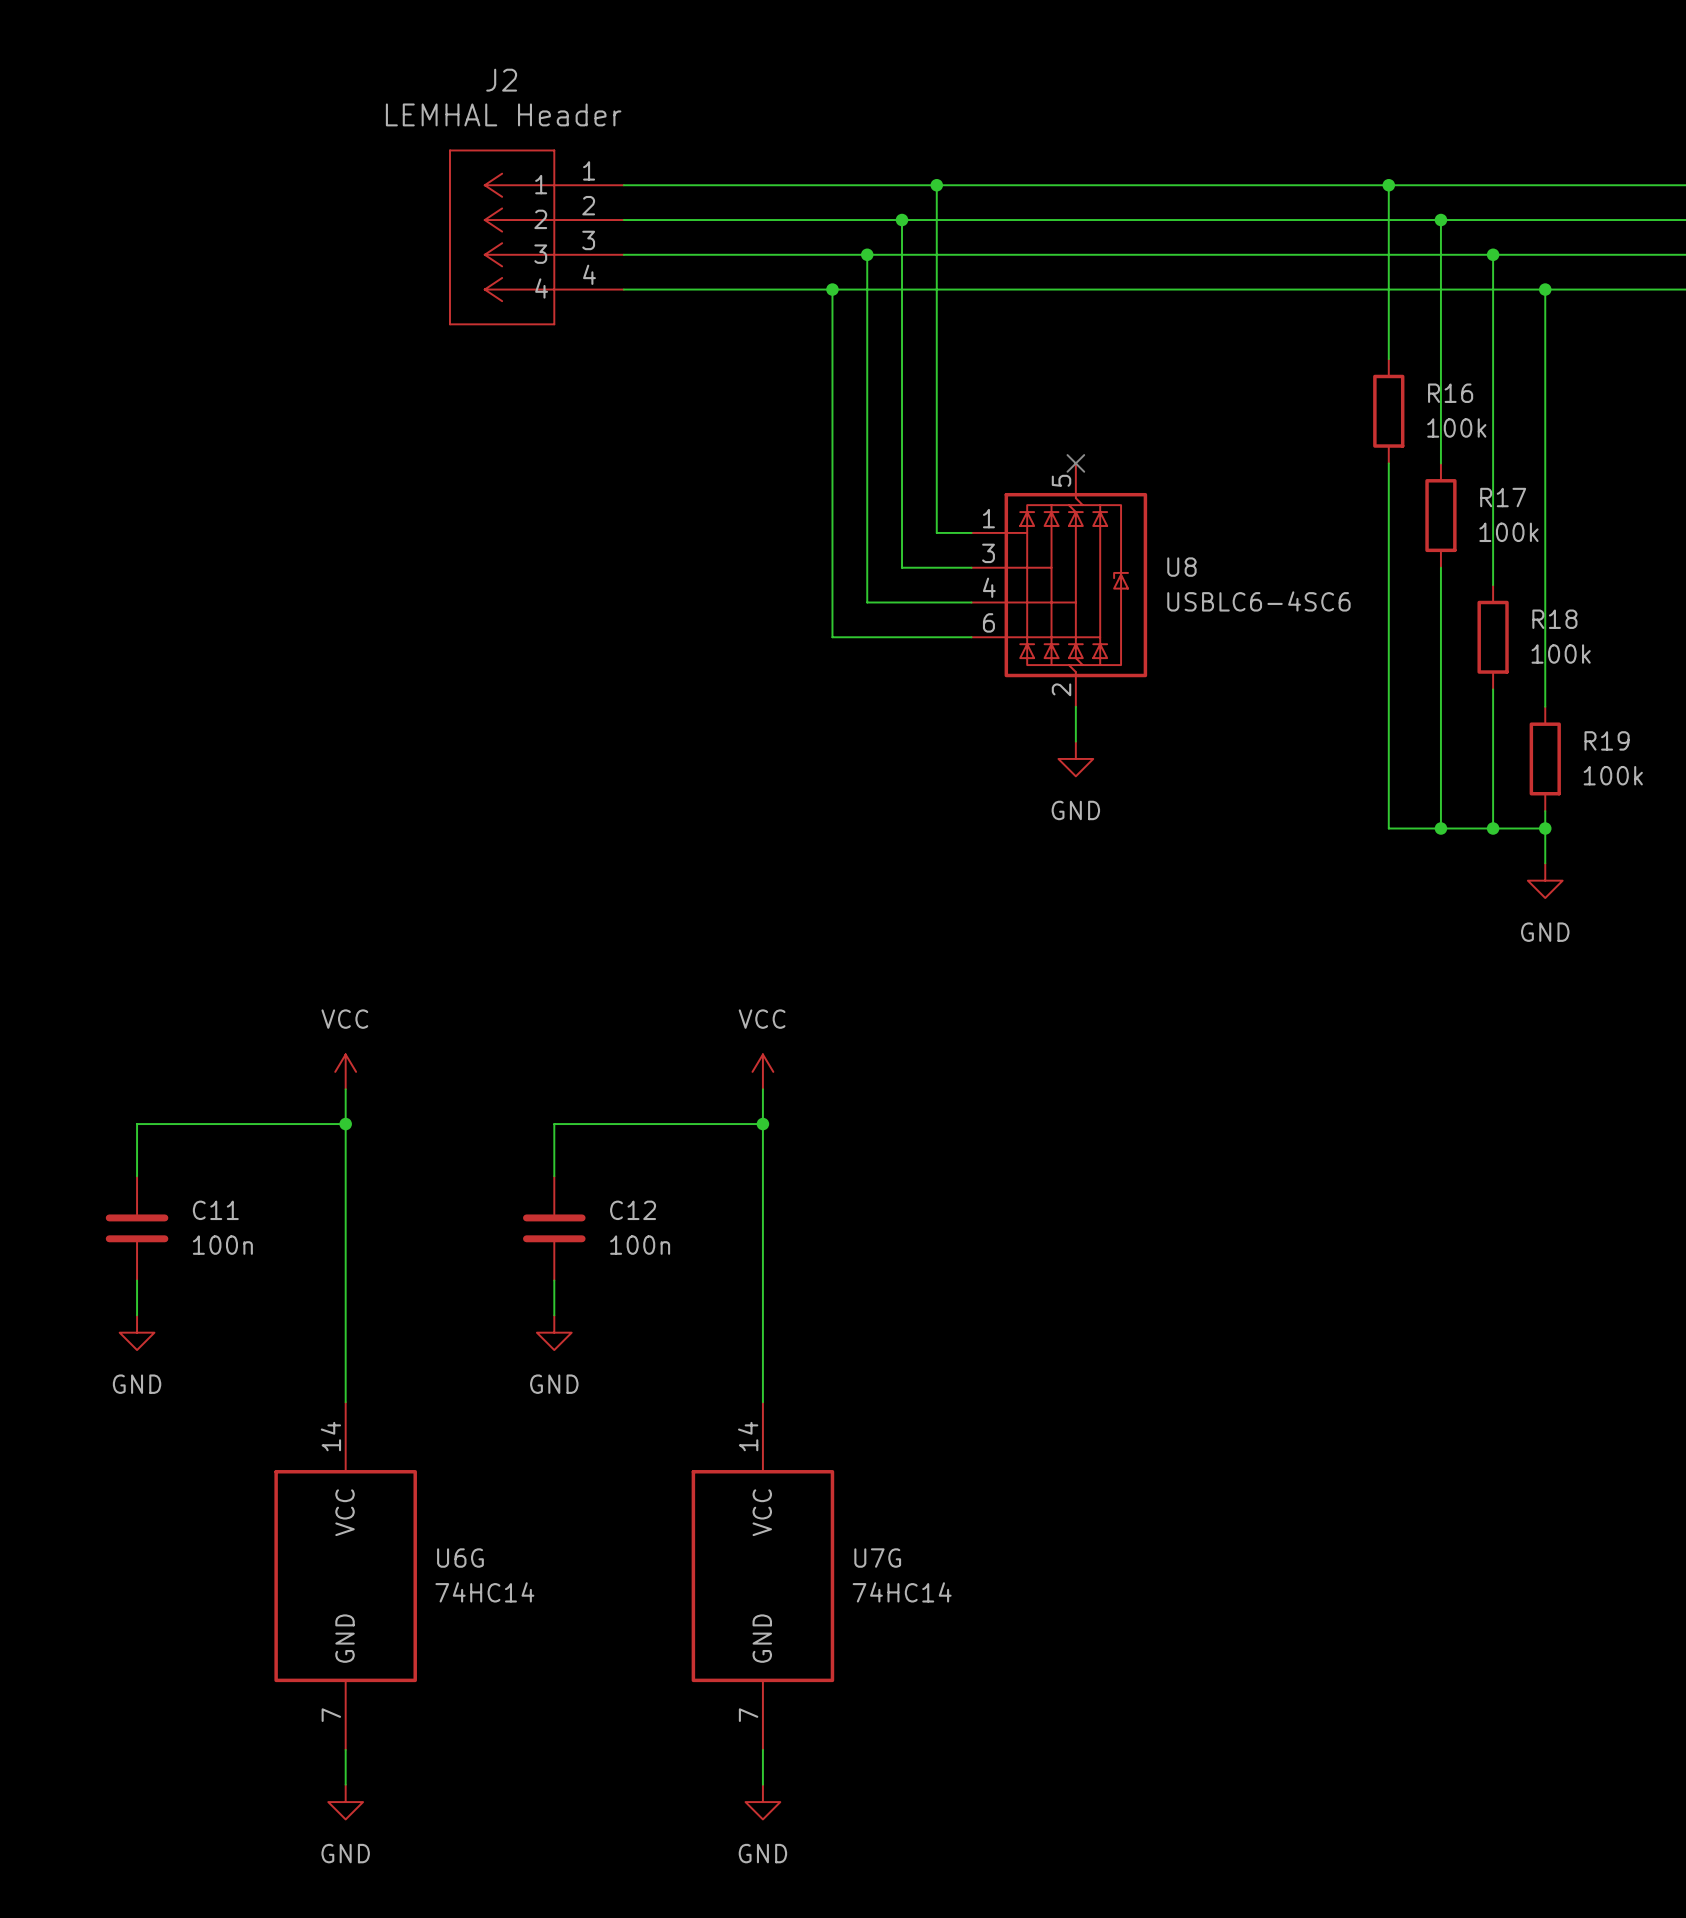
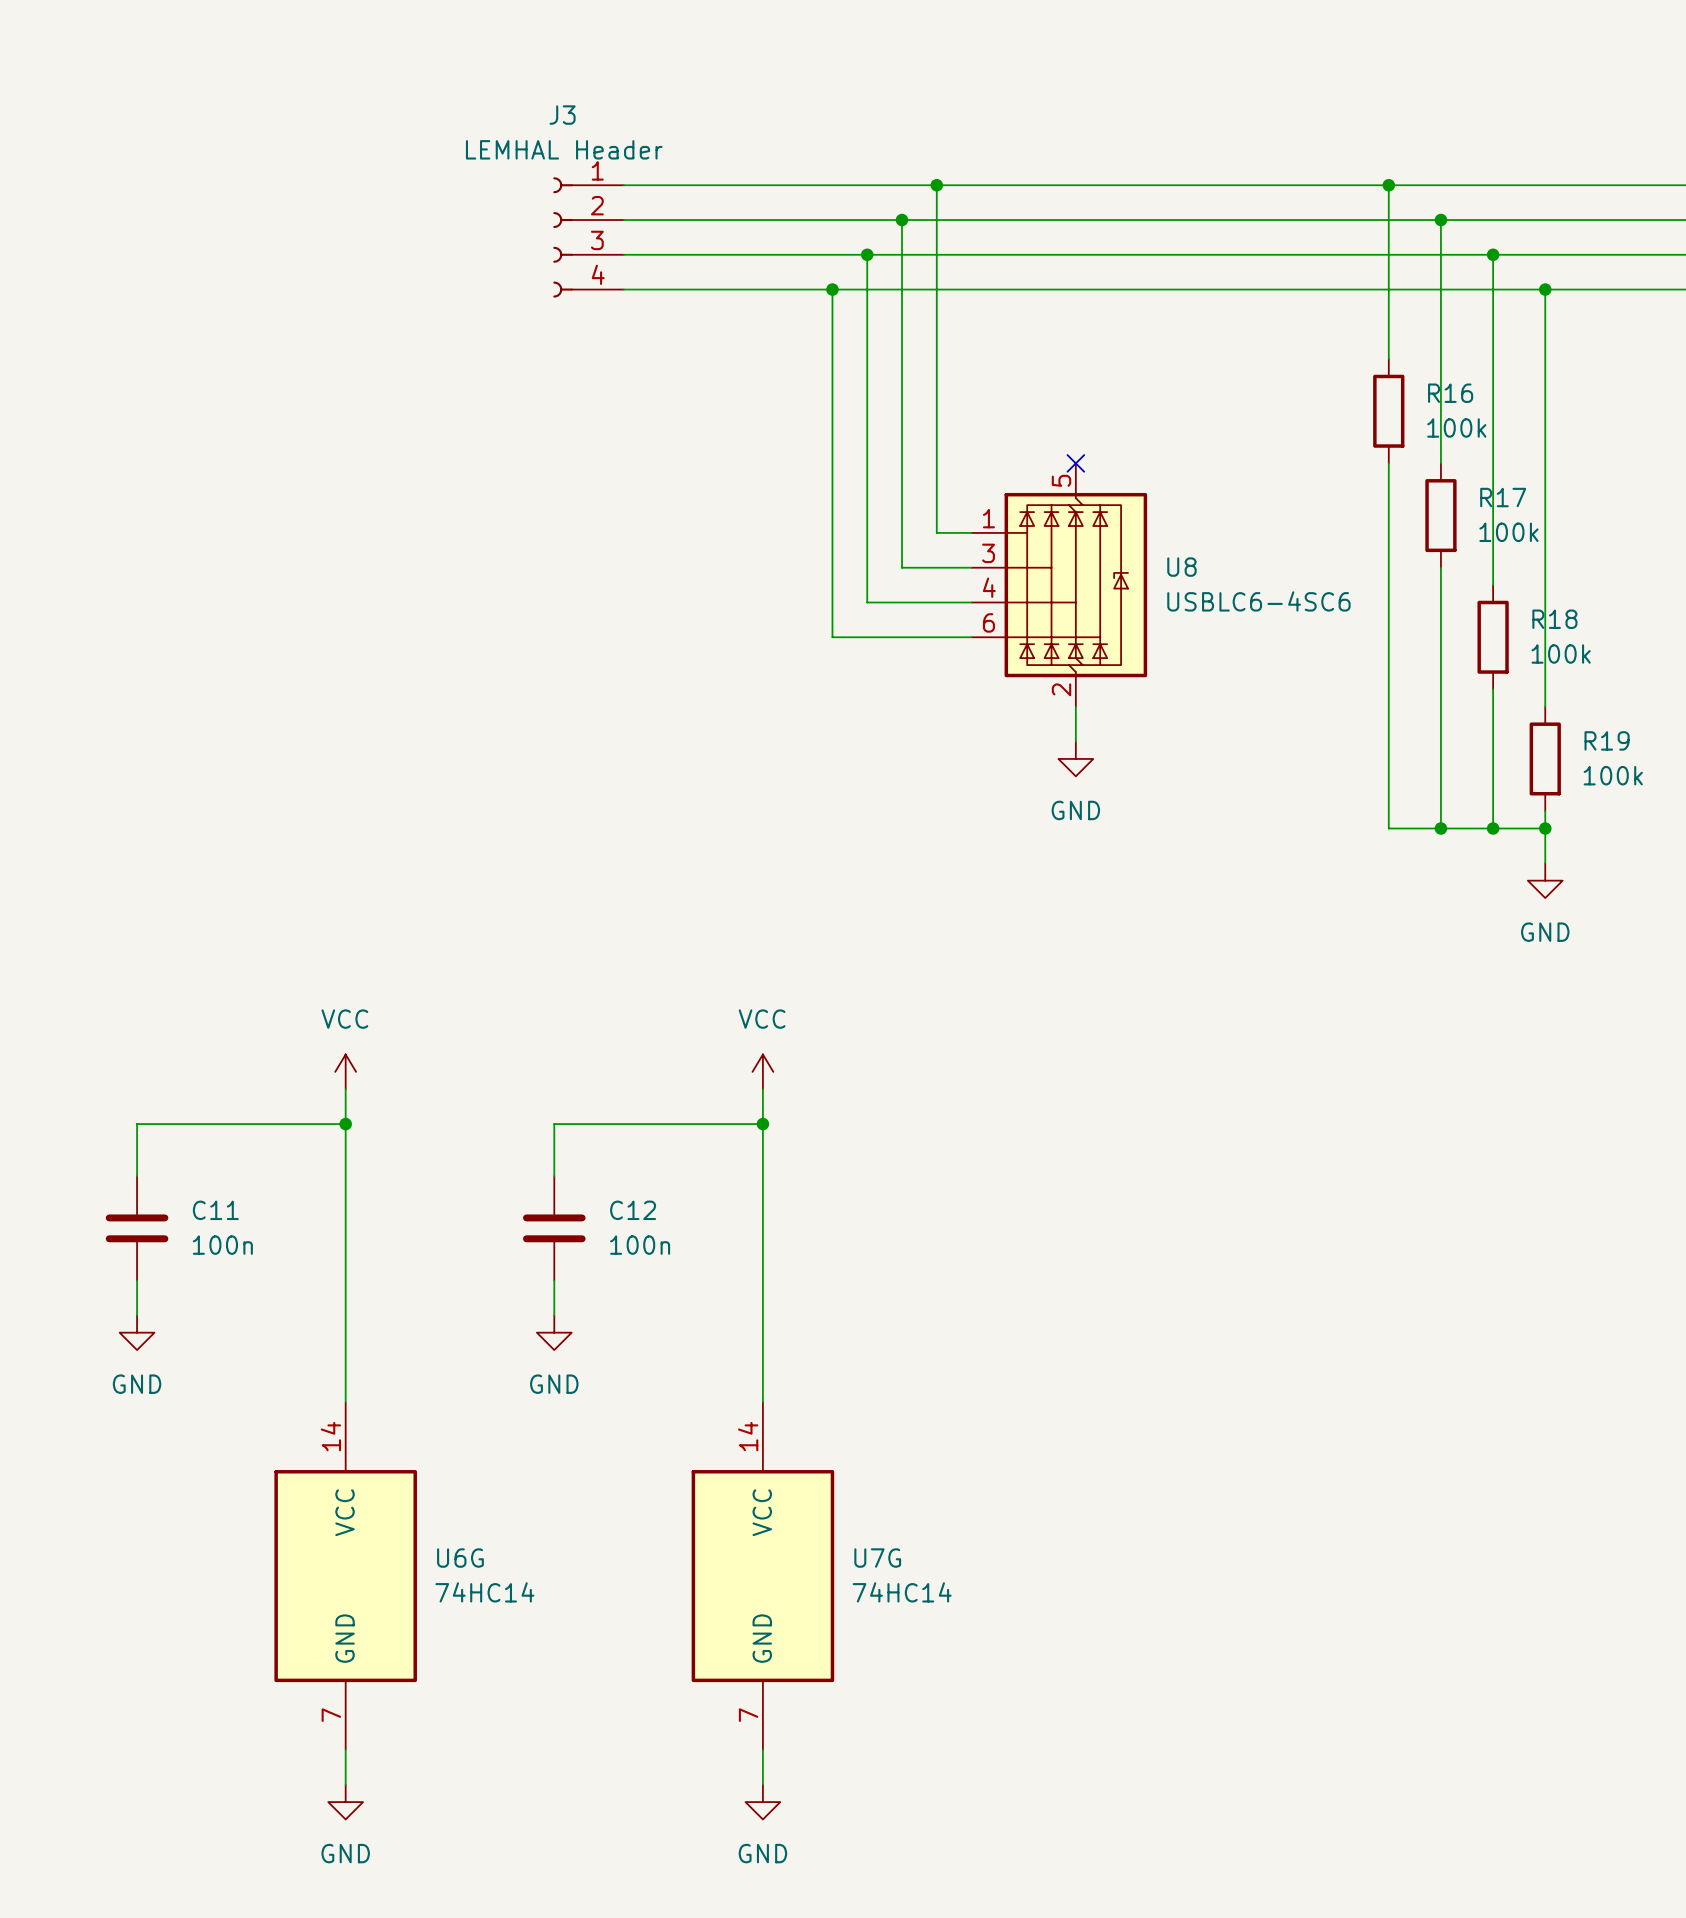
J2: LEMHAL Header (536, 237) -> none
J3: none -> LEMHAL Header (588, 237)

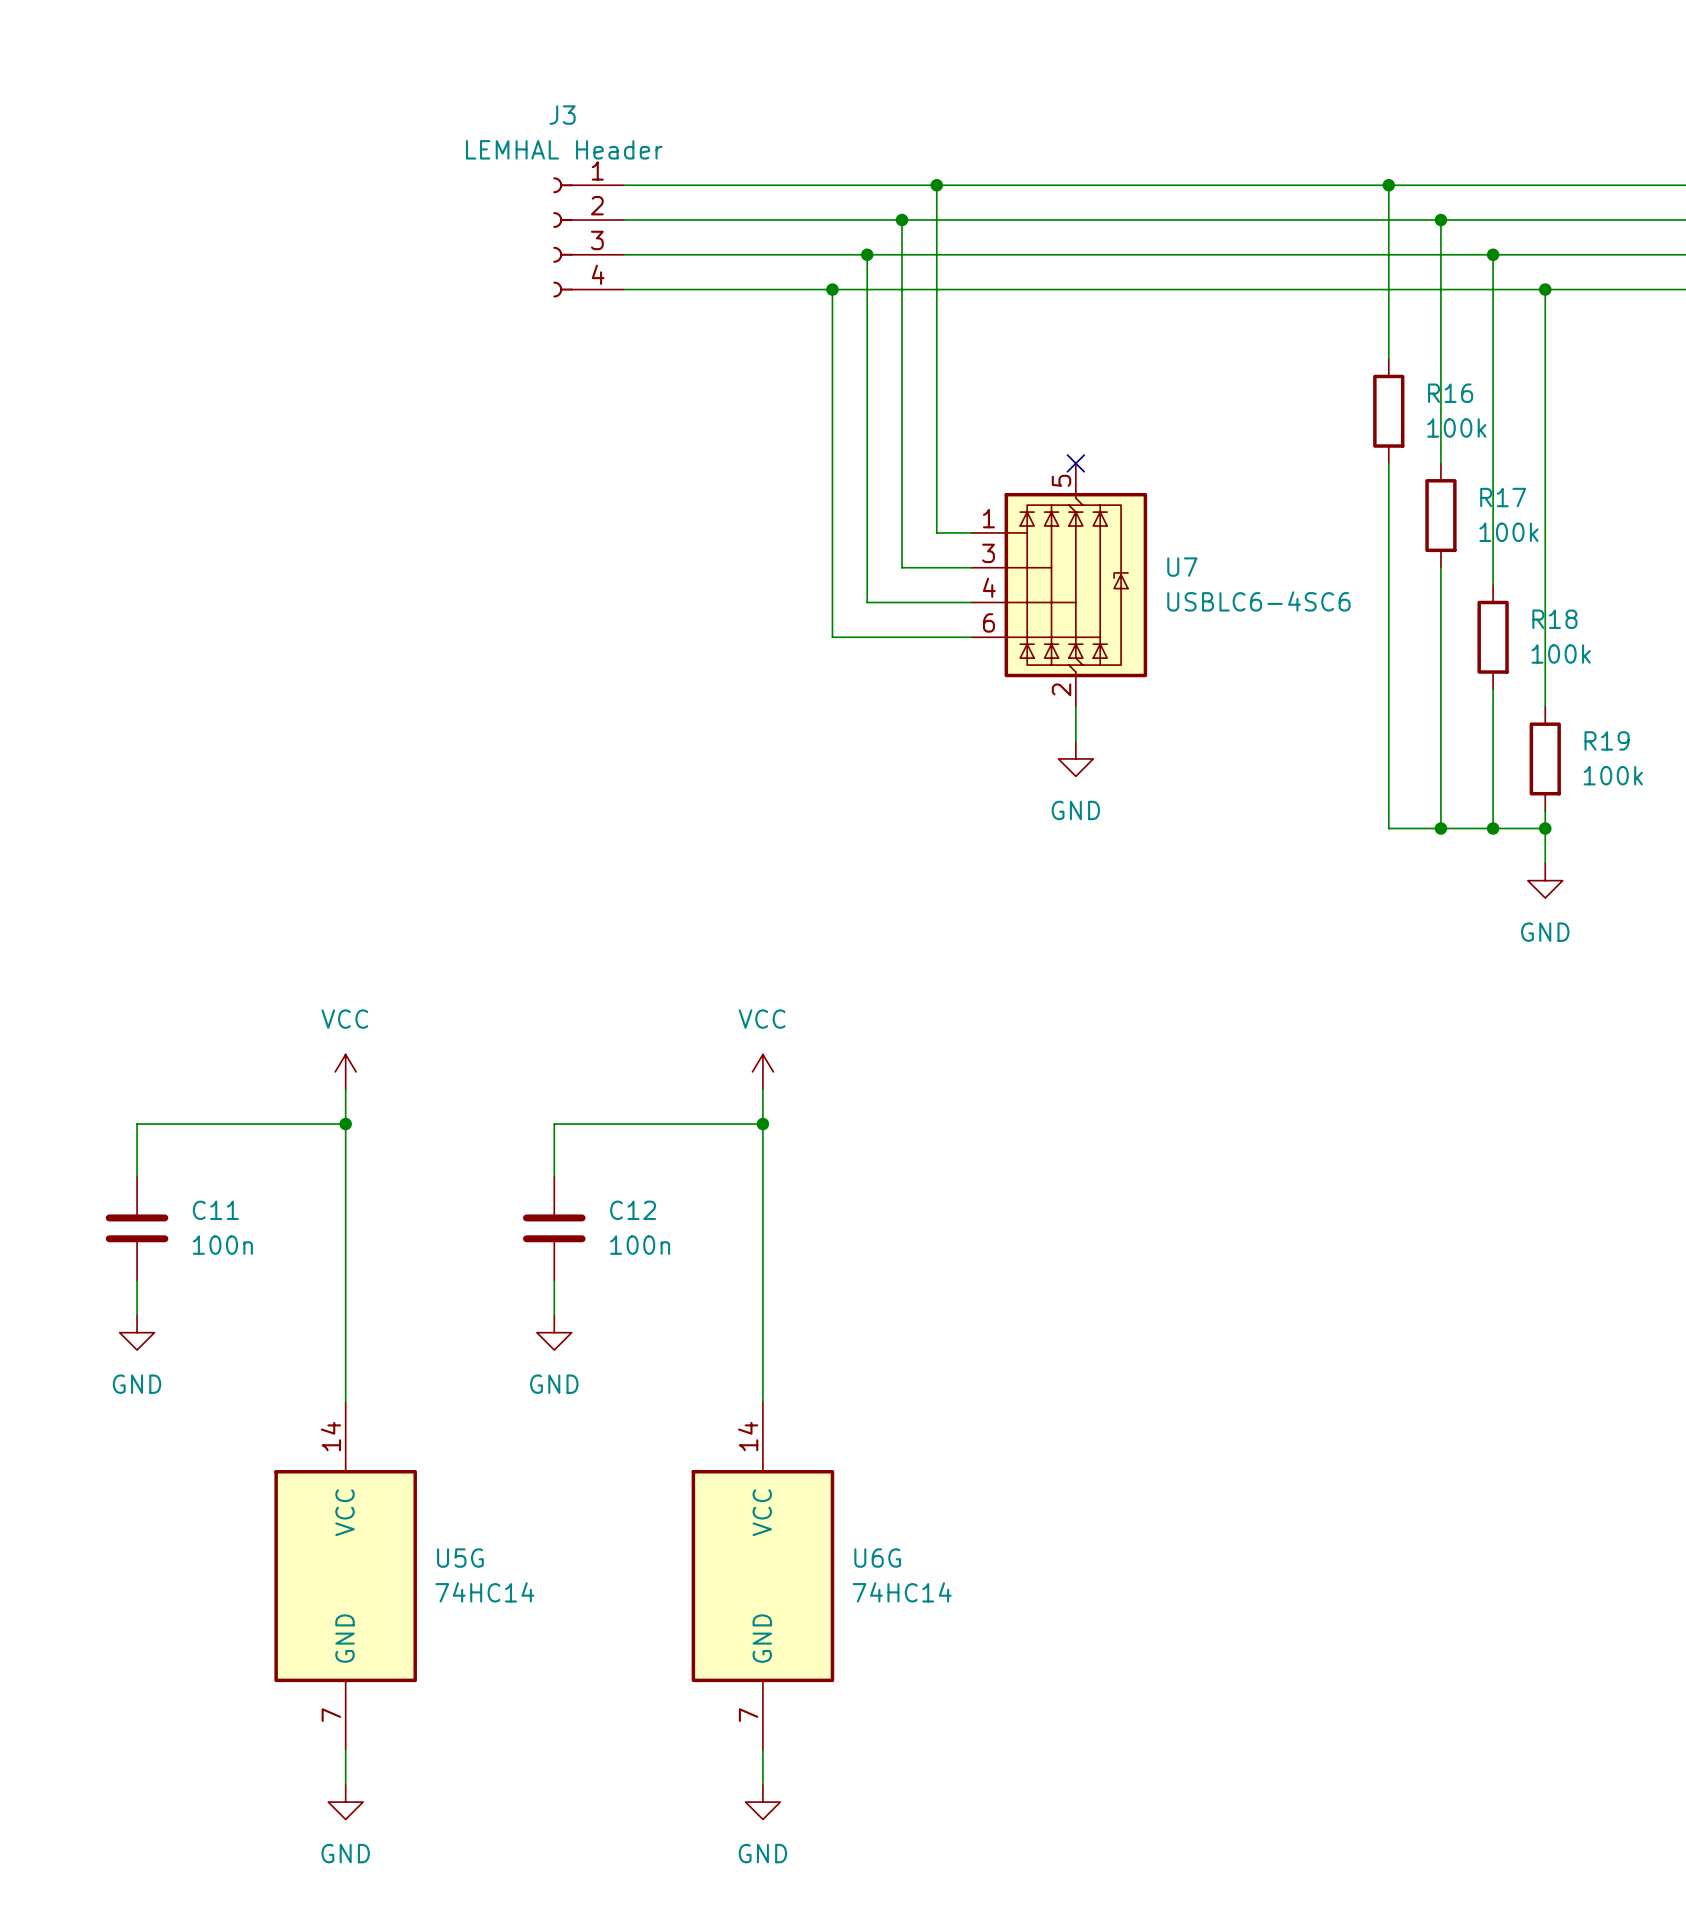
U8 name: U8 (1181, 567) -> U7 (1182, 567)
U6G name: U6G (460, 1558) -> U5G (460, 1558)
U7G name: U7G (877, 1558) -> U6G (877, 1558)

